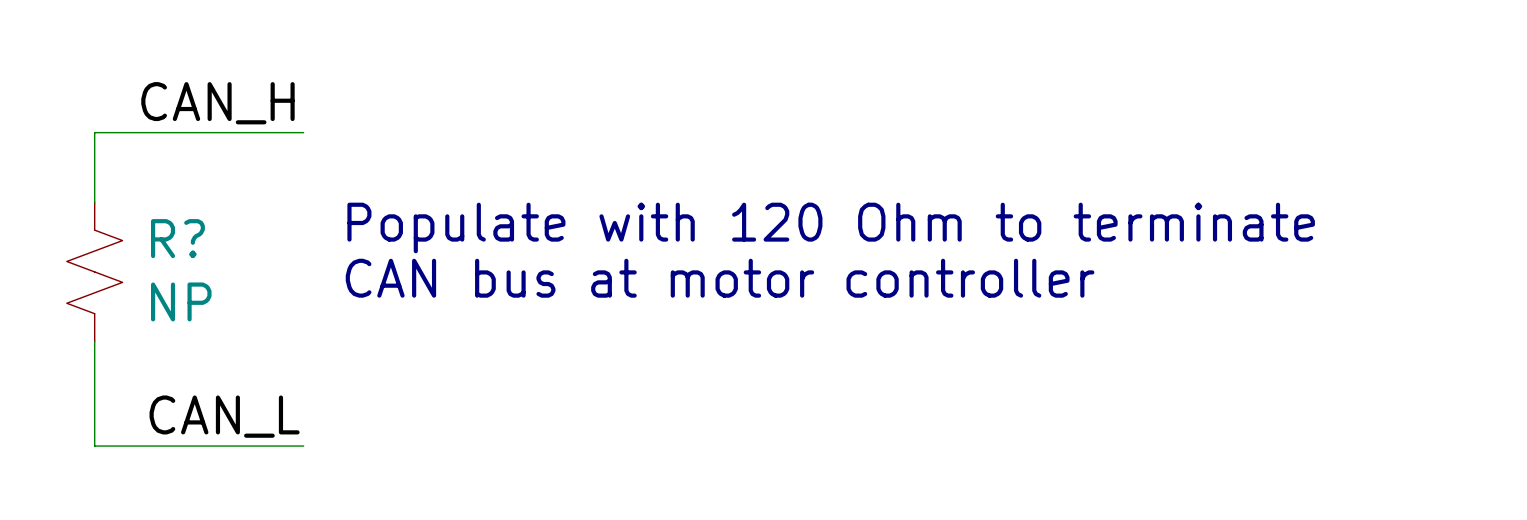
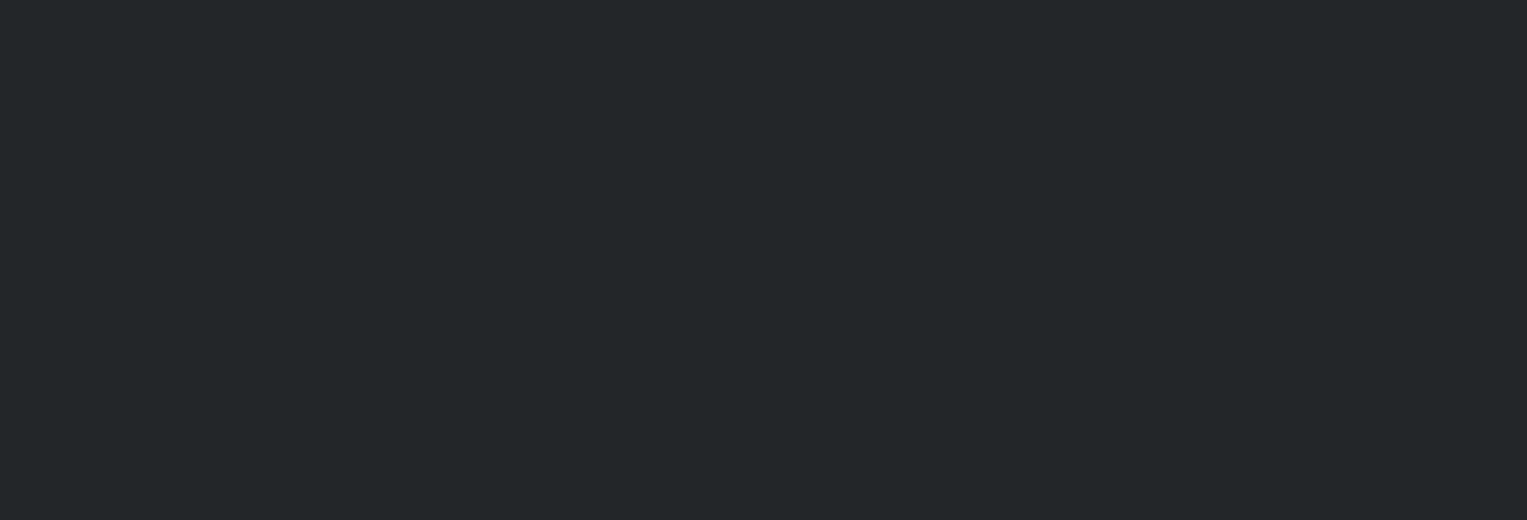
label: CAN_H (217, 103) -> none
wire: (303, 132) (94, 132) (94, 202) -> none
text: Populate with 120 Ohm to terminate (831, 227) -> none
R?: NP (94, 271) -> none
text: CAN bus at motor controller (720, 278) -> none
wire: (94, 341) (94, 446) (303, 446) -> none
label: CAN_L (224, 416) -> none

